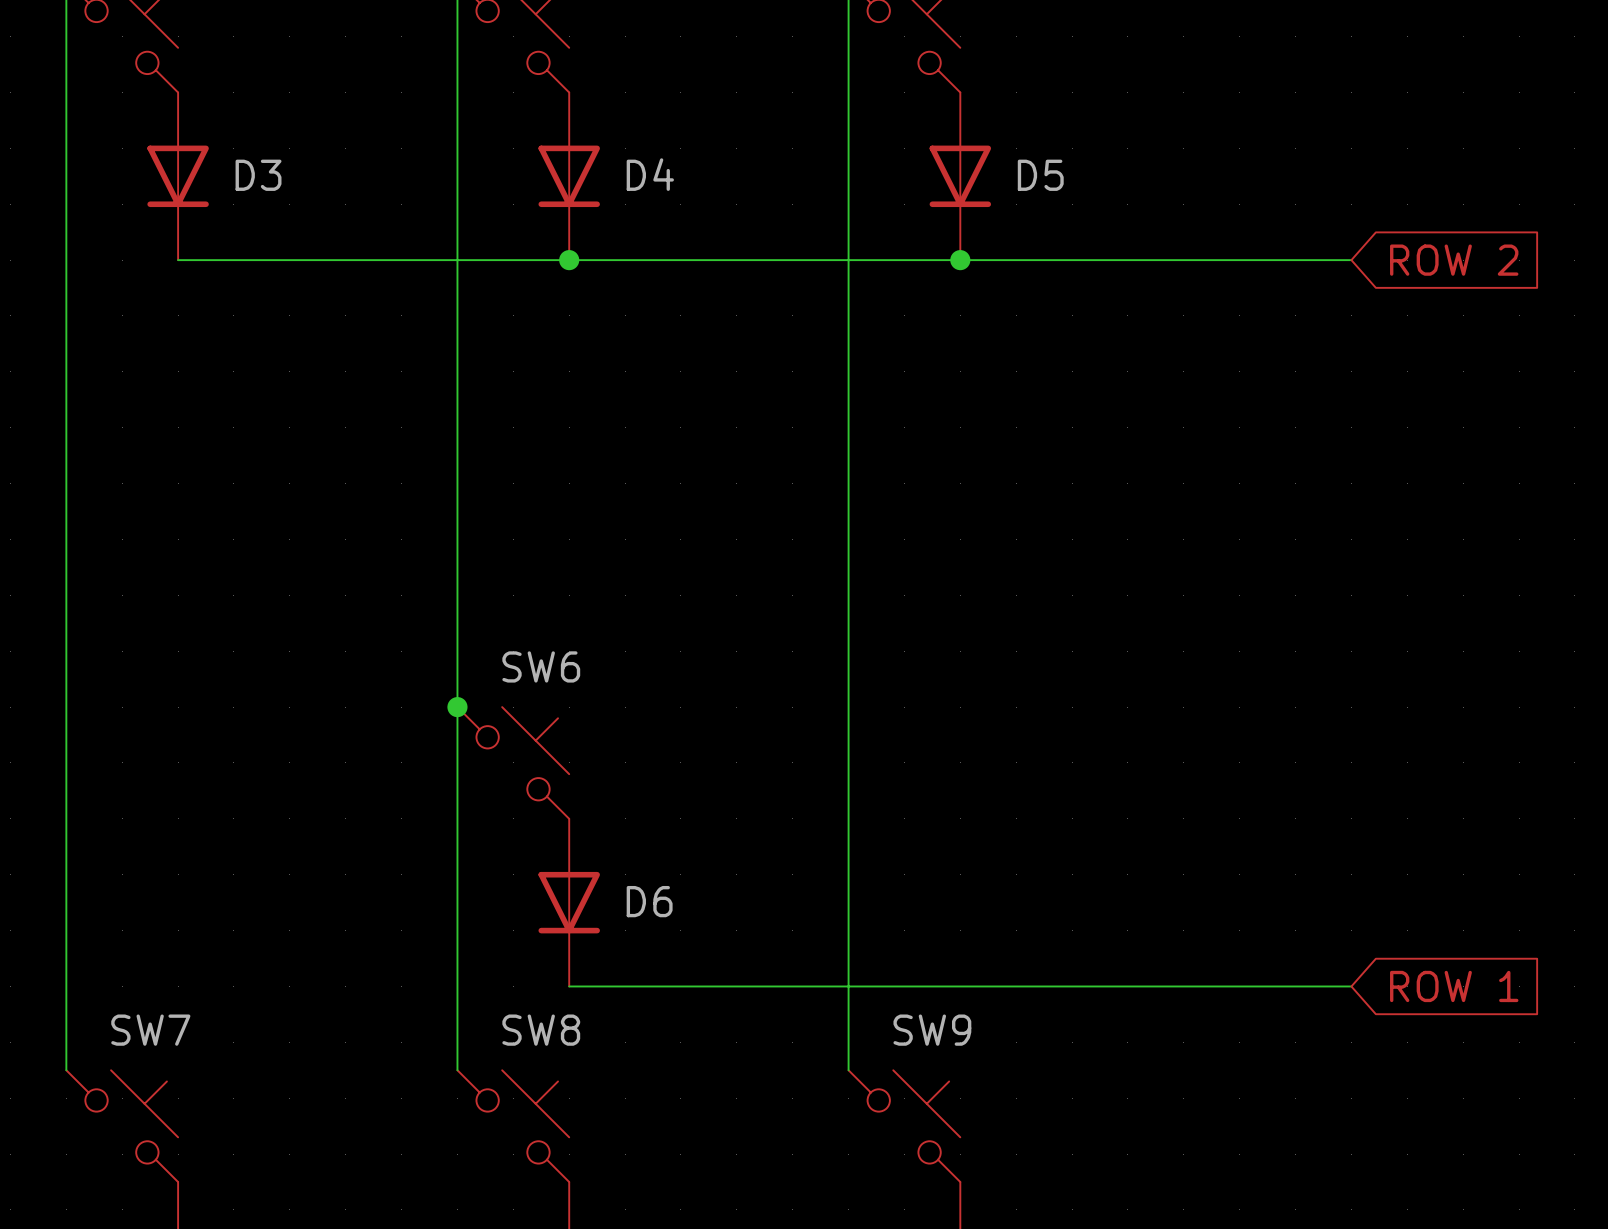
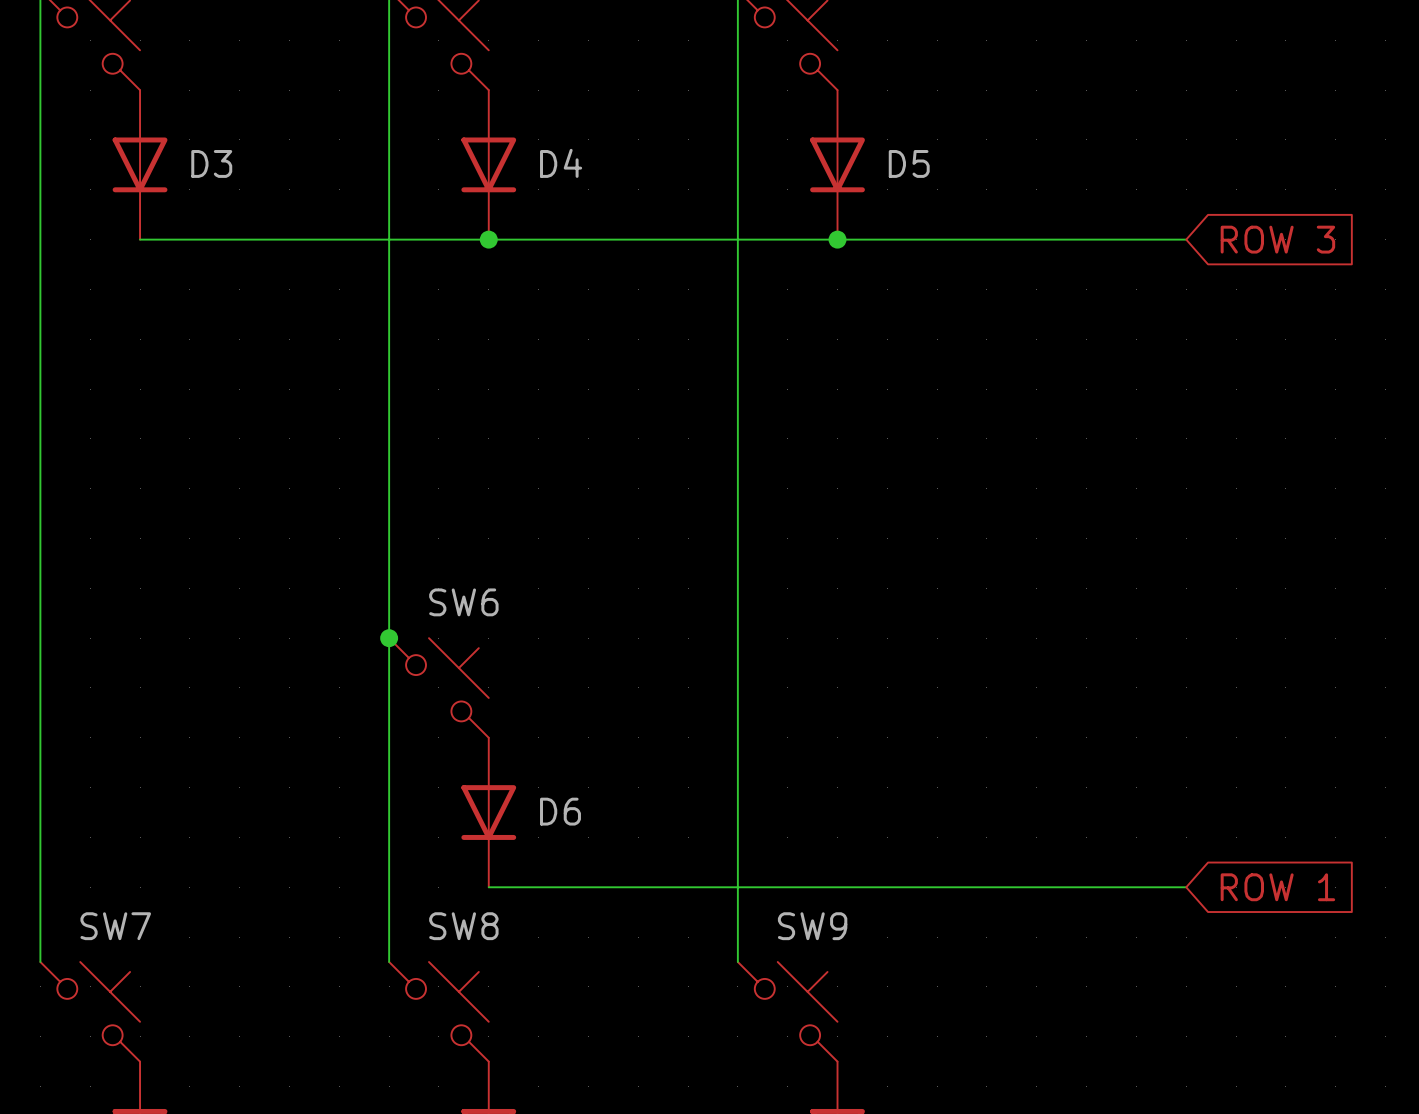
global label: ROW 2 (1454, 260) -> ROW 3 (1277, 239)

